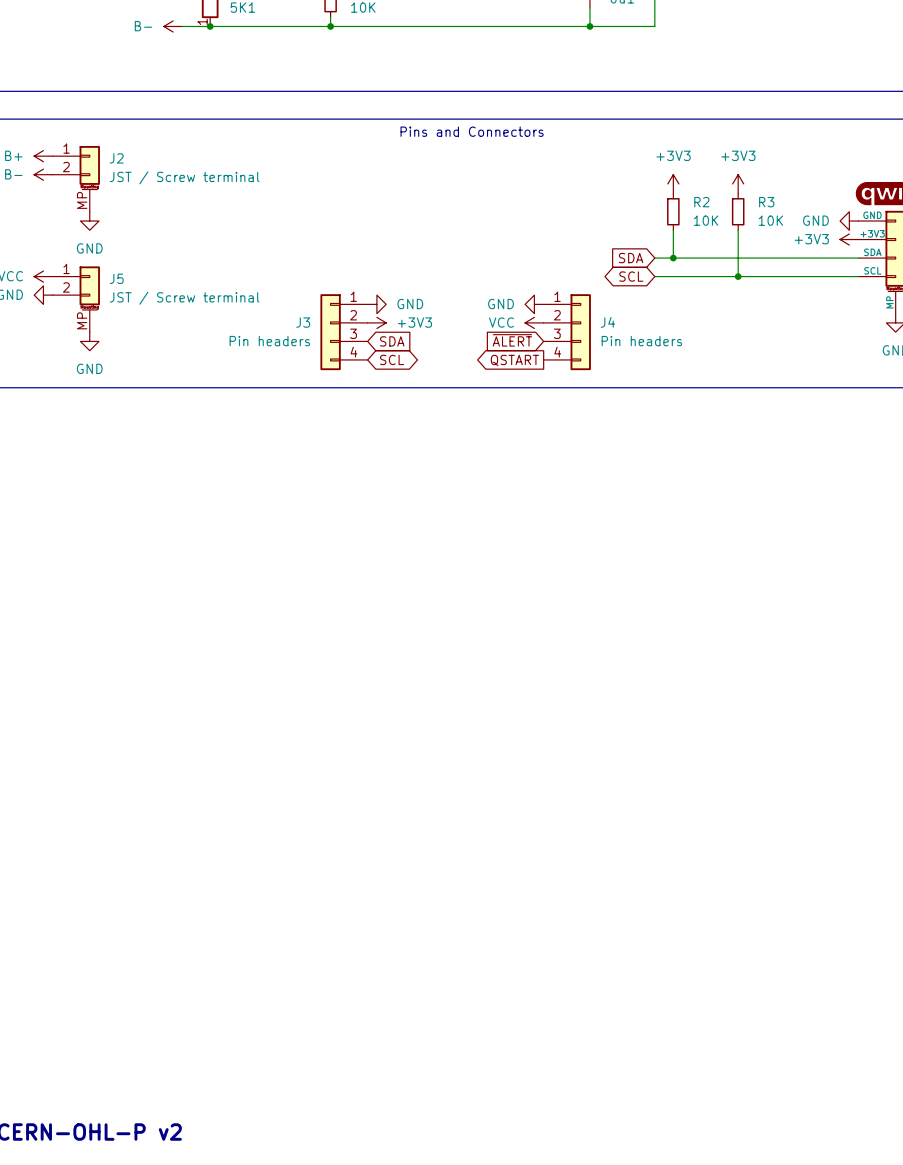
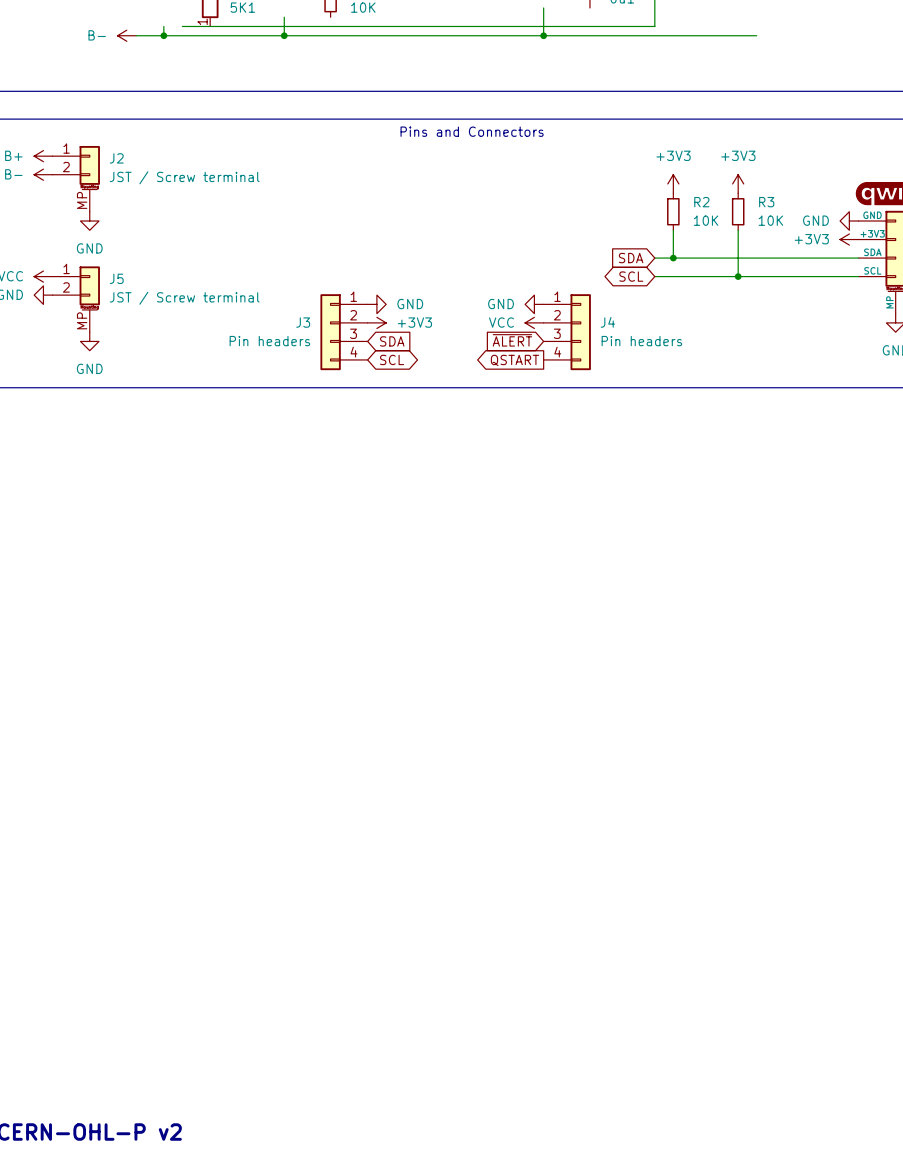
wire: none -> (543, 7) (543, 35)
wire: (589, 7) (589, 26) -> none
wire: none -> (284, 17) (284, 35)
wire: (330, 17) (330, 26) -> (163, 26) (163, 35)
power symbol position: B- (173, 26) -> B- (126, 35)
junction: (210, 26) -> none
junction: (330, 26) -> none
junction: (589, 26) -> none
wire: none -> (136, 35) (756, 35)
junction: none -> (163, 35)
junction: none -> (284, 35)
junction: none -> (543, 35)

